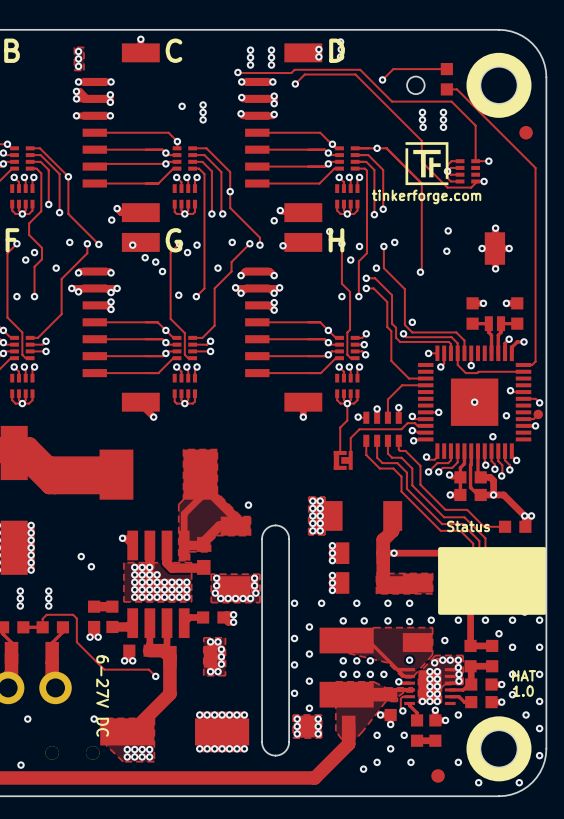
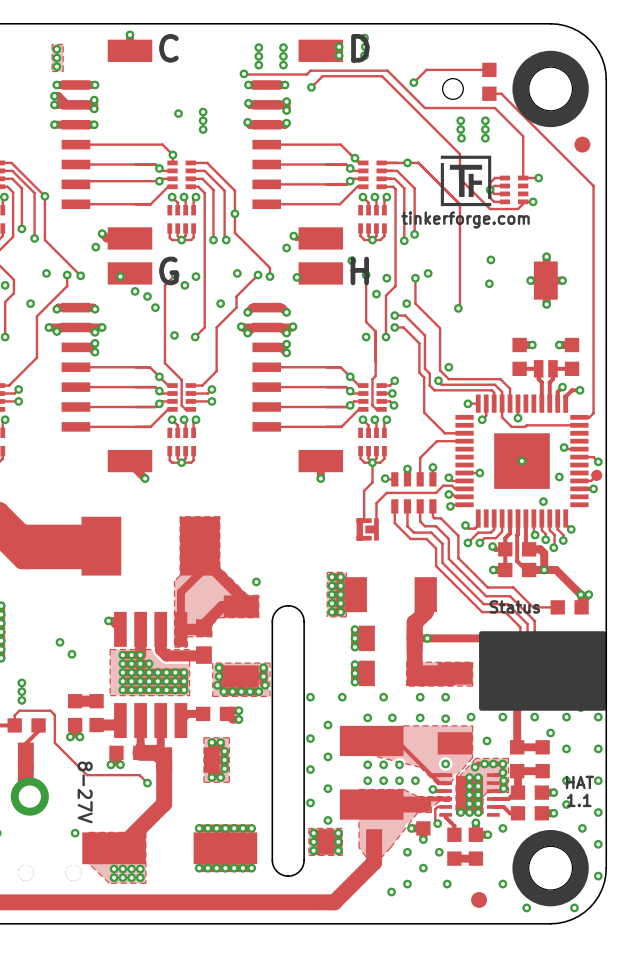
text: 1.0 (523, 691) -> 1.1 (579, 800)
text: 6-27V DC (102, 696) -> 8-27V (85, 792)

